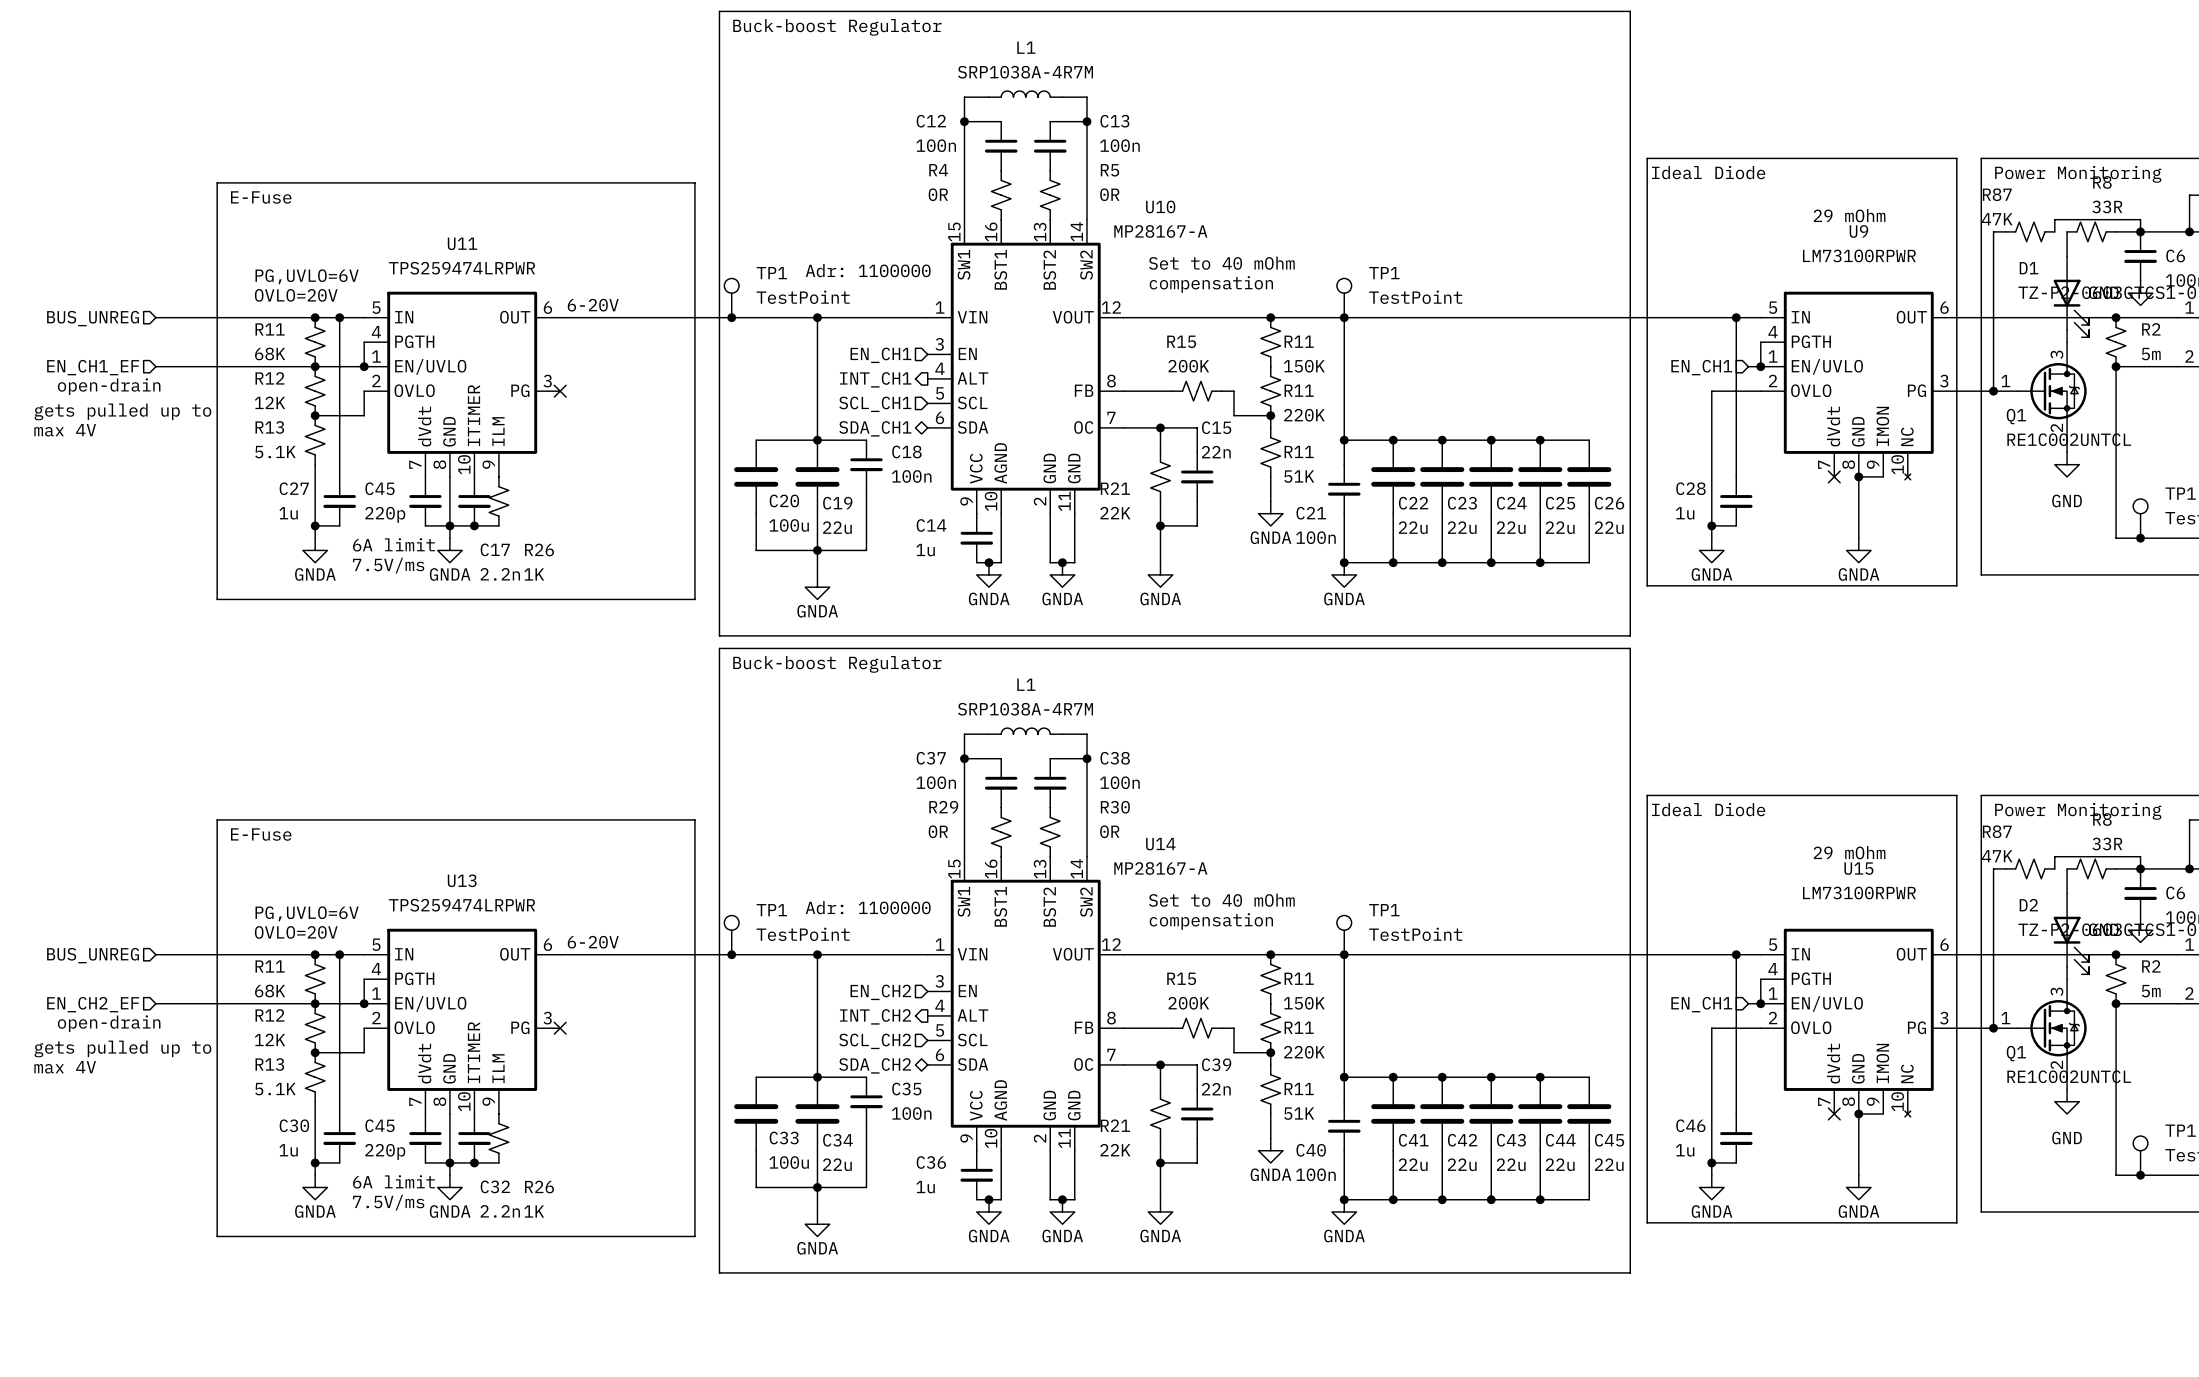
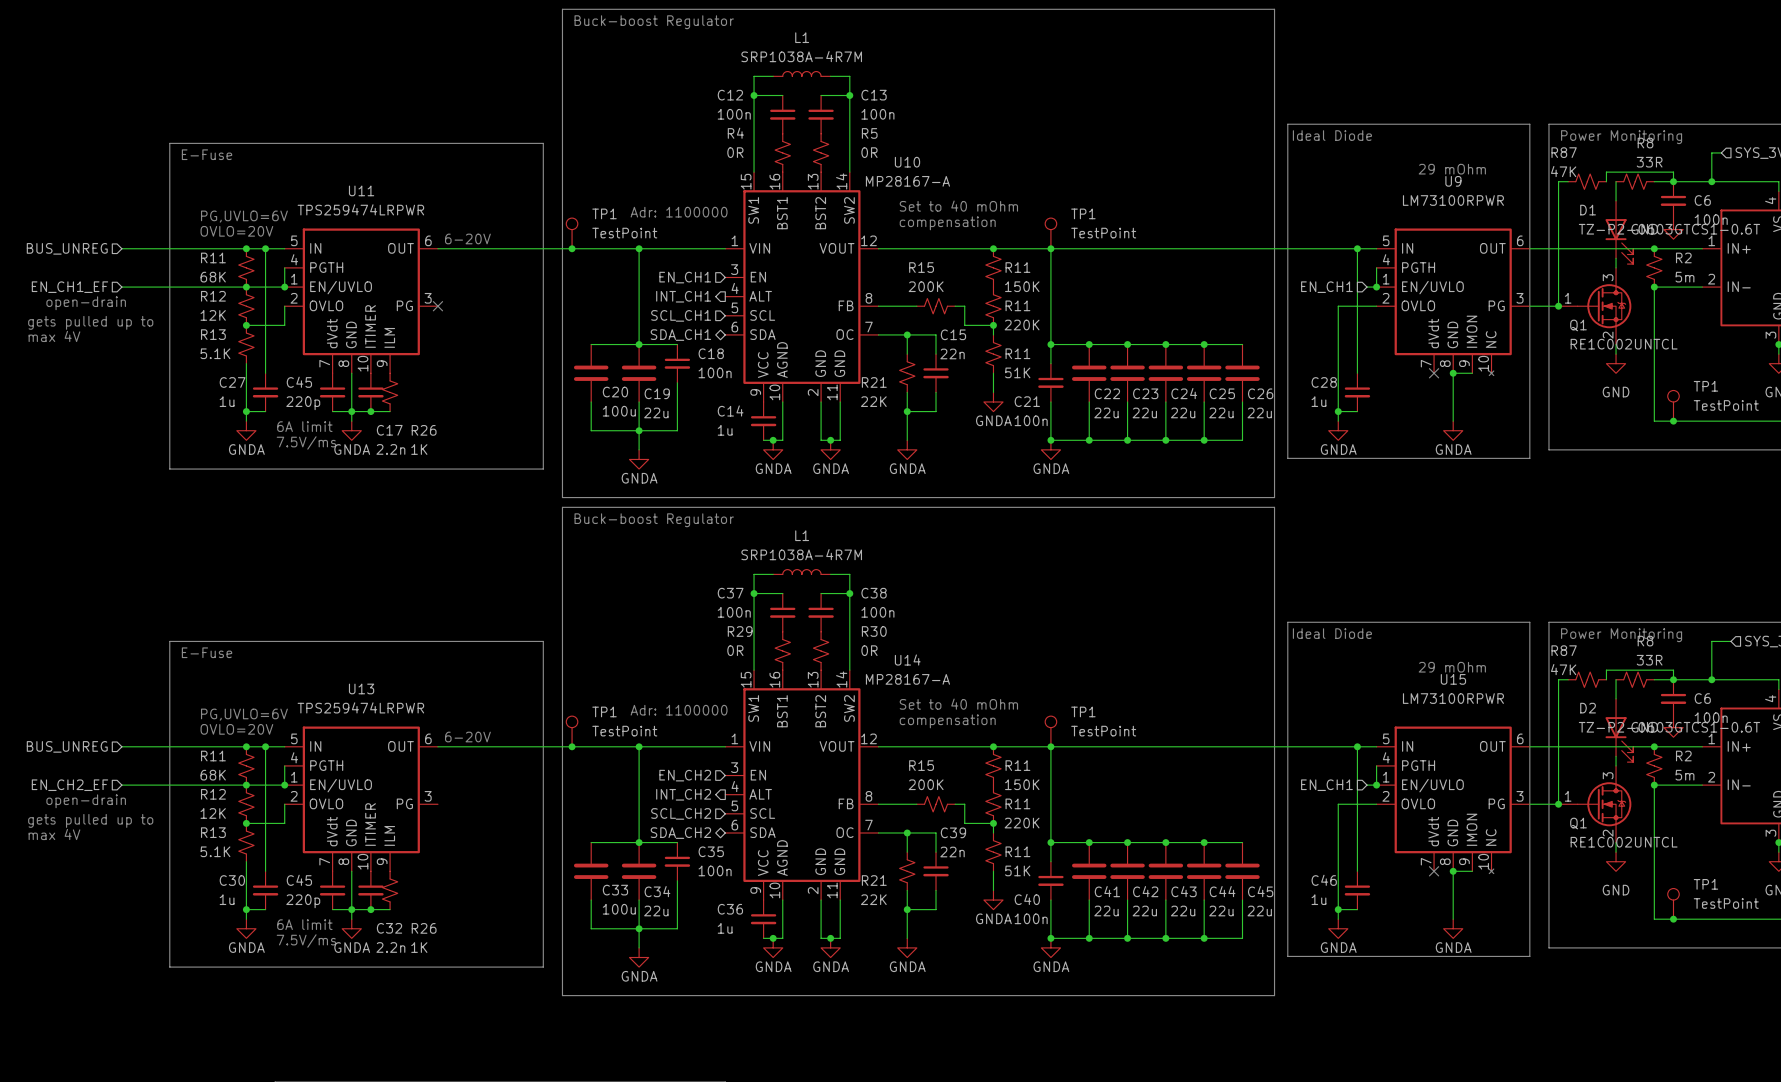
no-connect mark: (560, 1028) -> none

